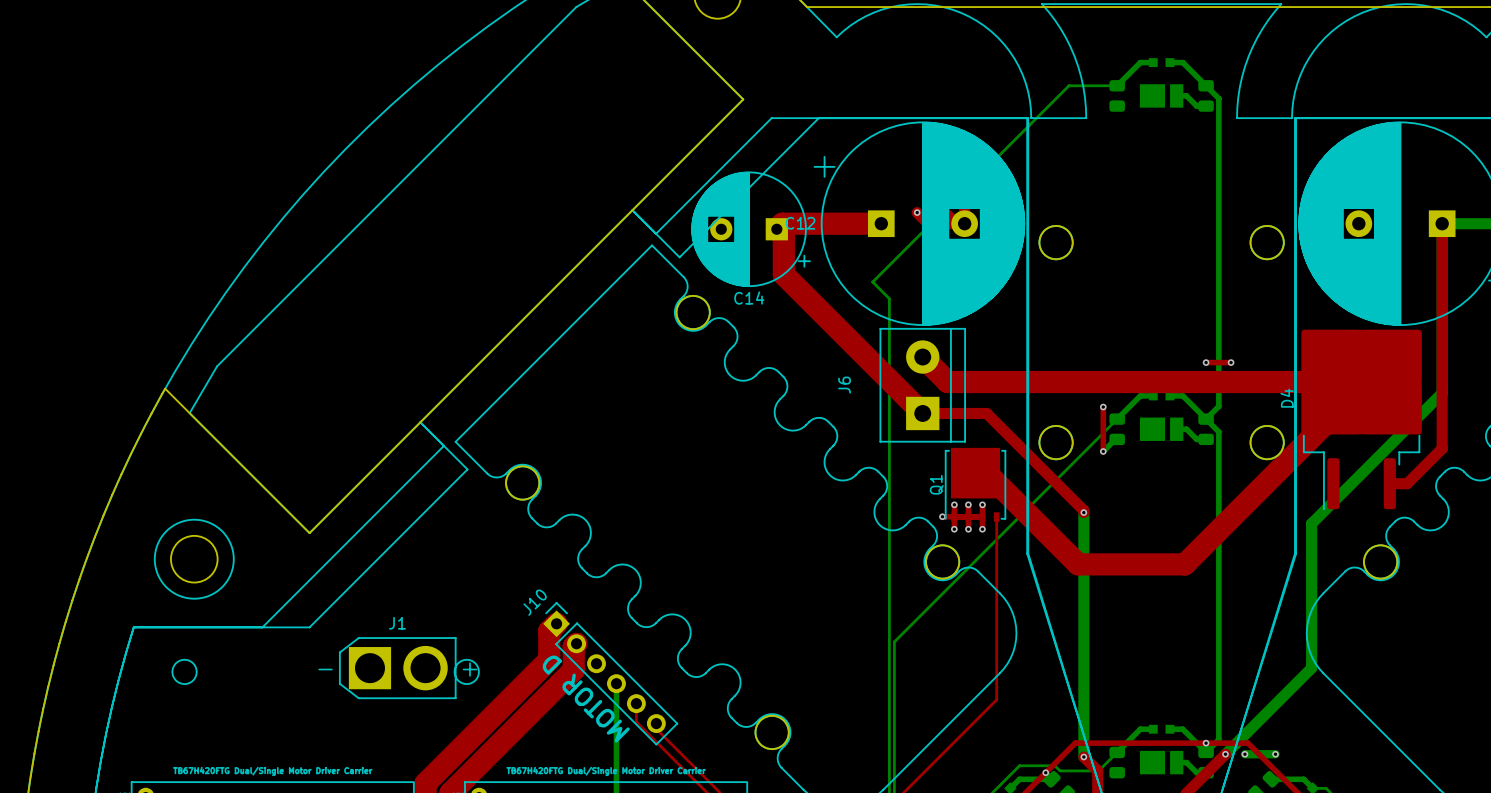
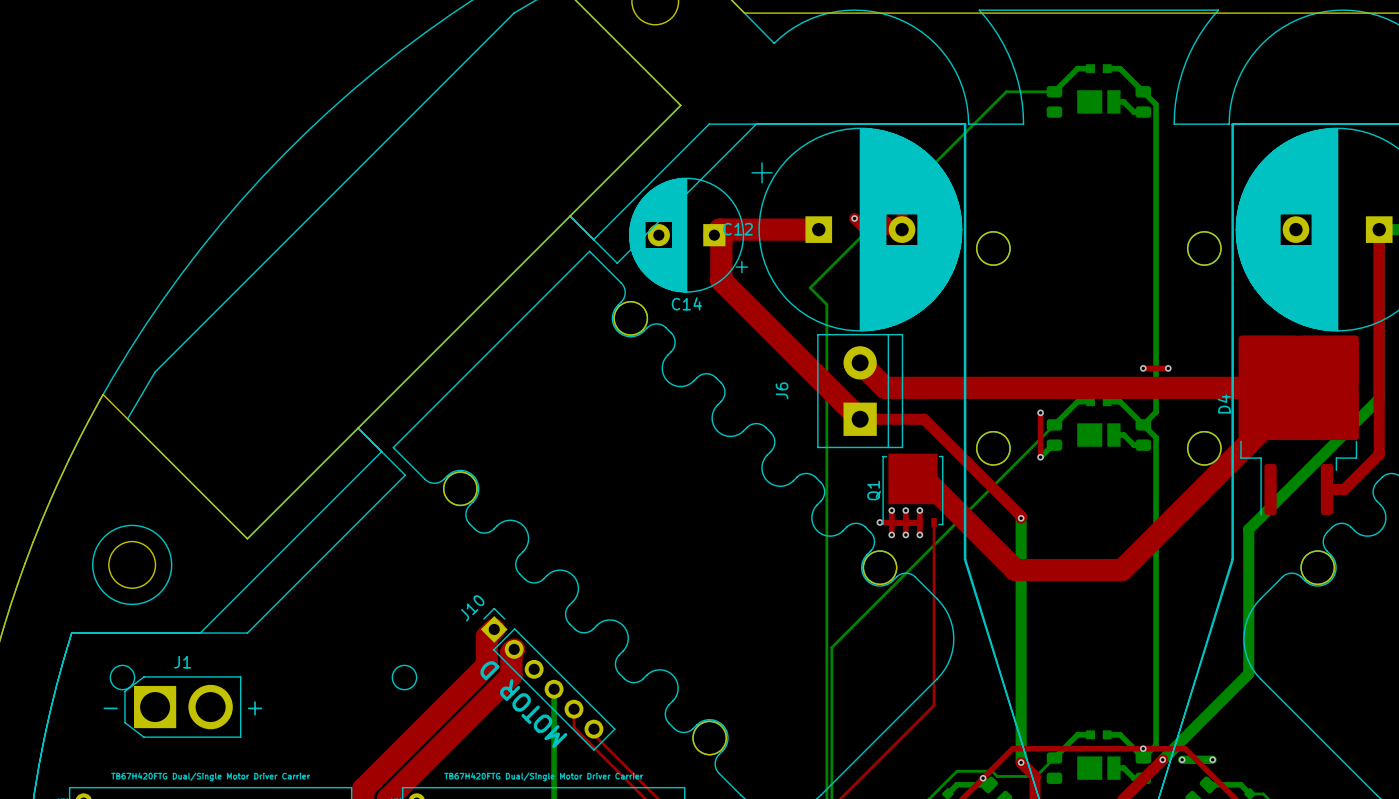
J1 position: (397, 668) -> (182, 707)

